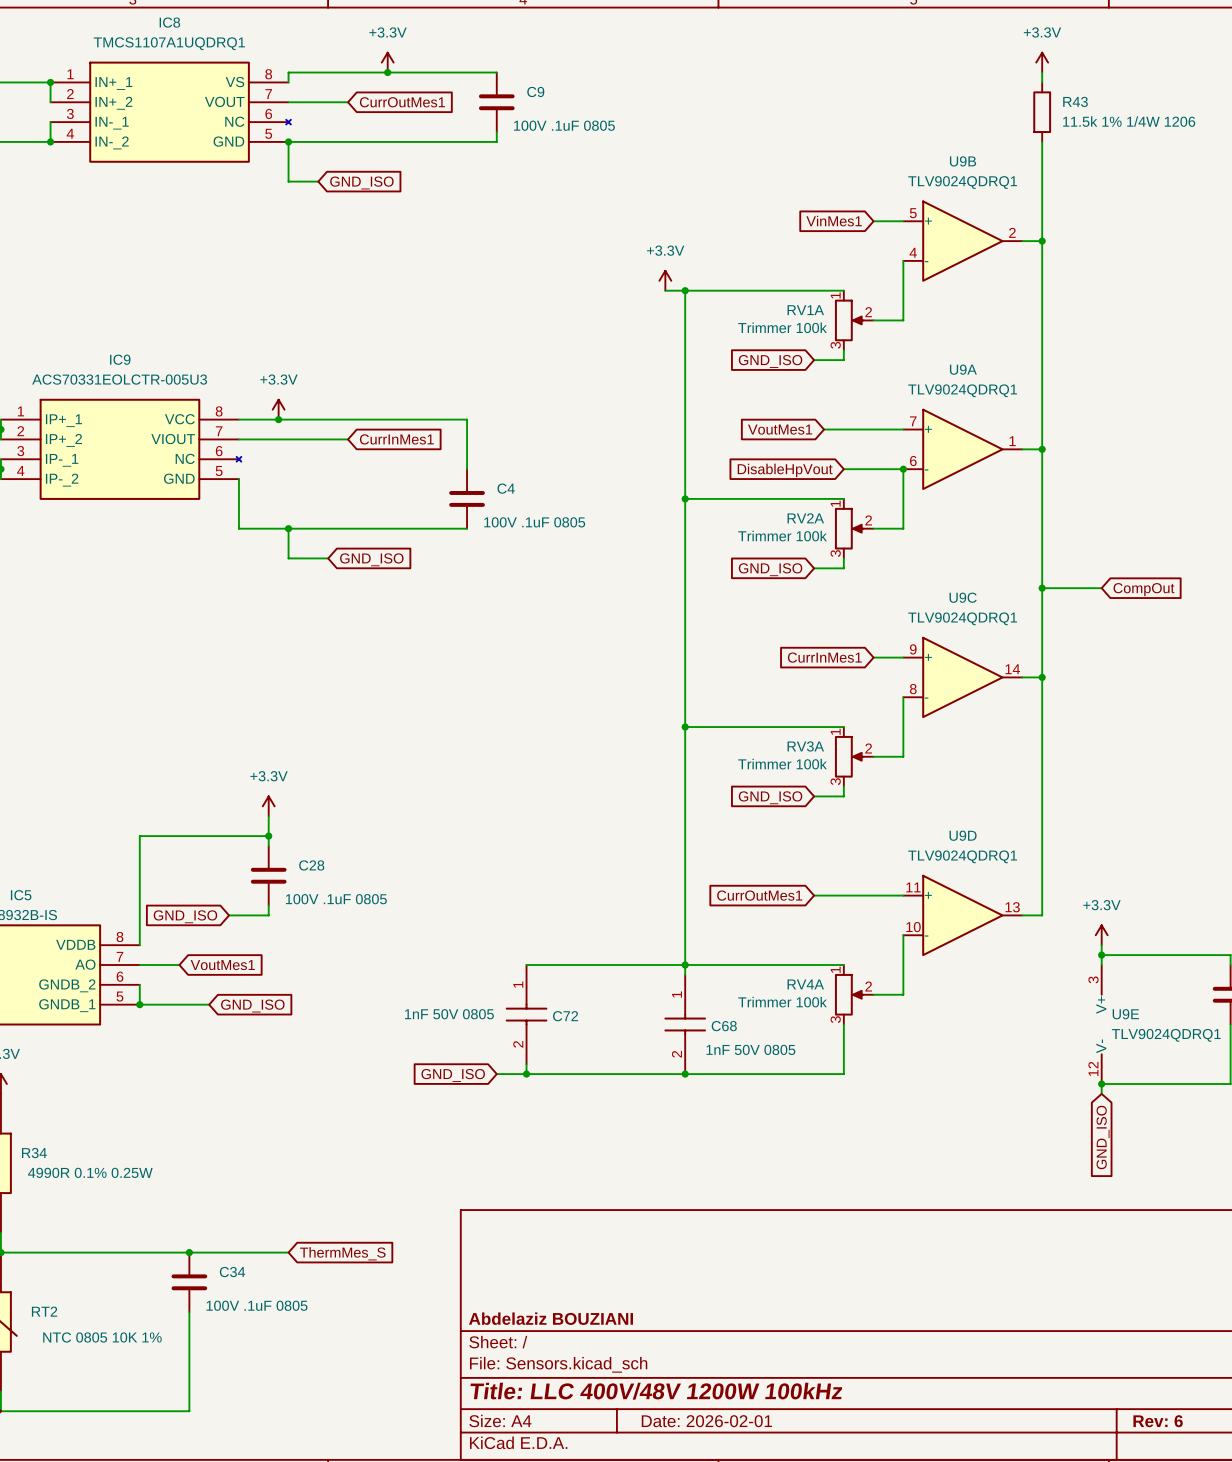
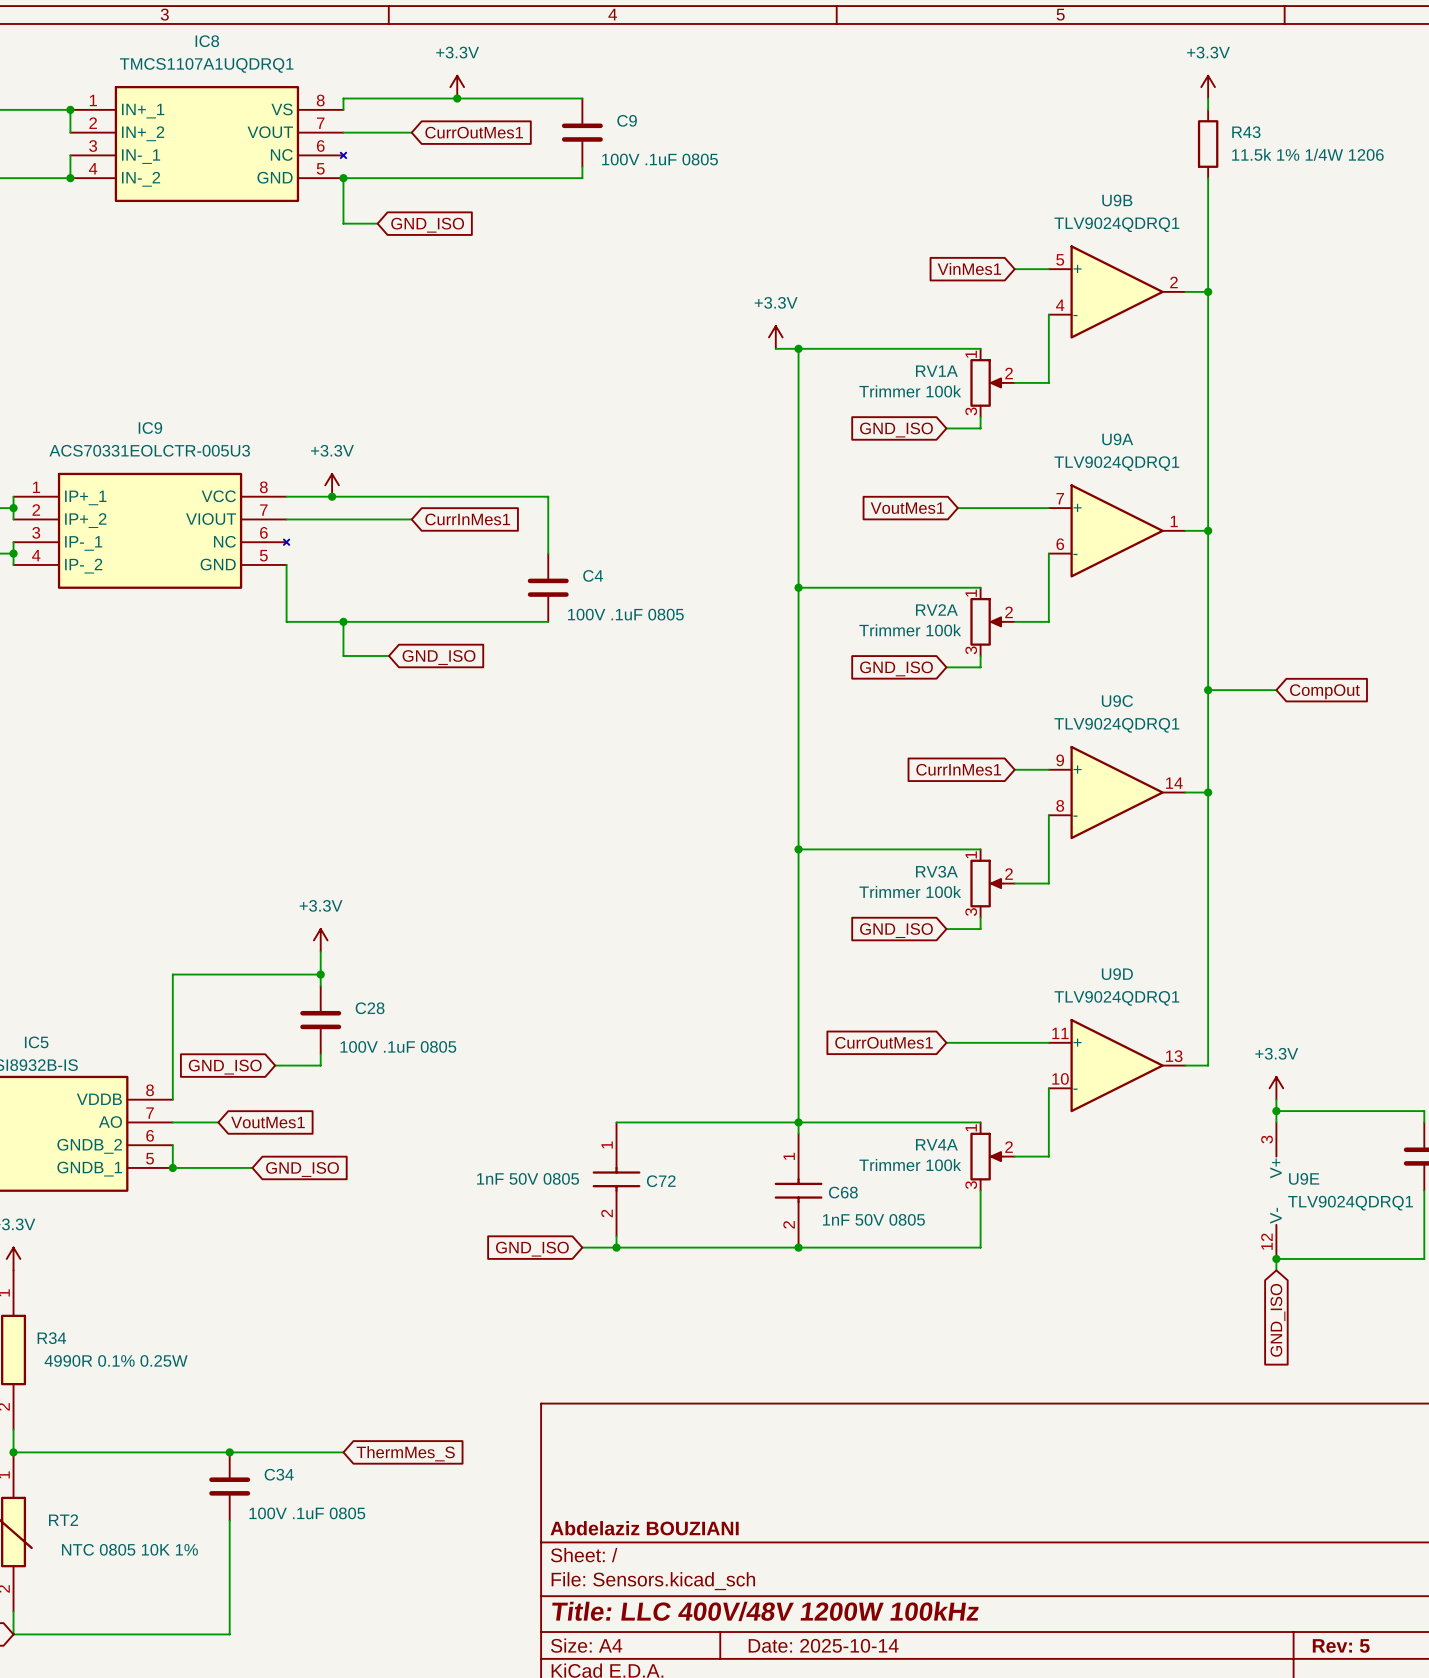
wire: (843, 469) (903, 469) -> none
junction: (903, 469) -> none
global label: DisableHpVout (785, 470) -> none
title block: Date: 2026-02-01 (706, 1421) -> Date: 2025-10-14 (823, 1645)
title block: Rev: 6 (1158, 1421) -> Rev: 5 (1341, 1645)

